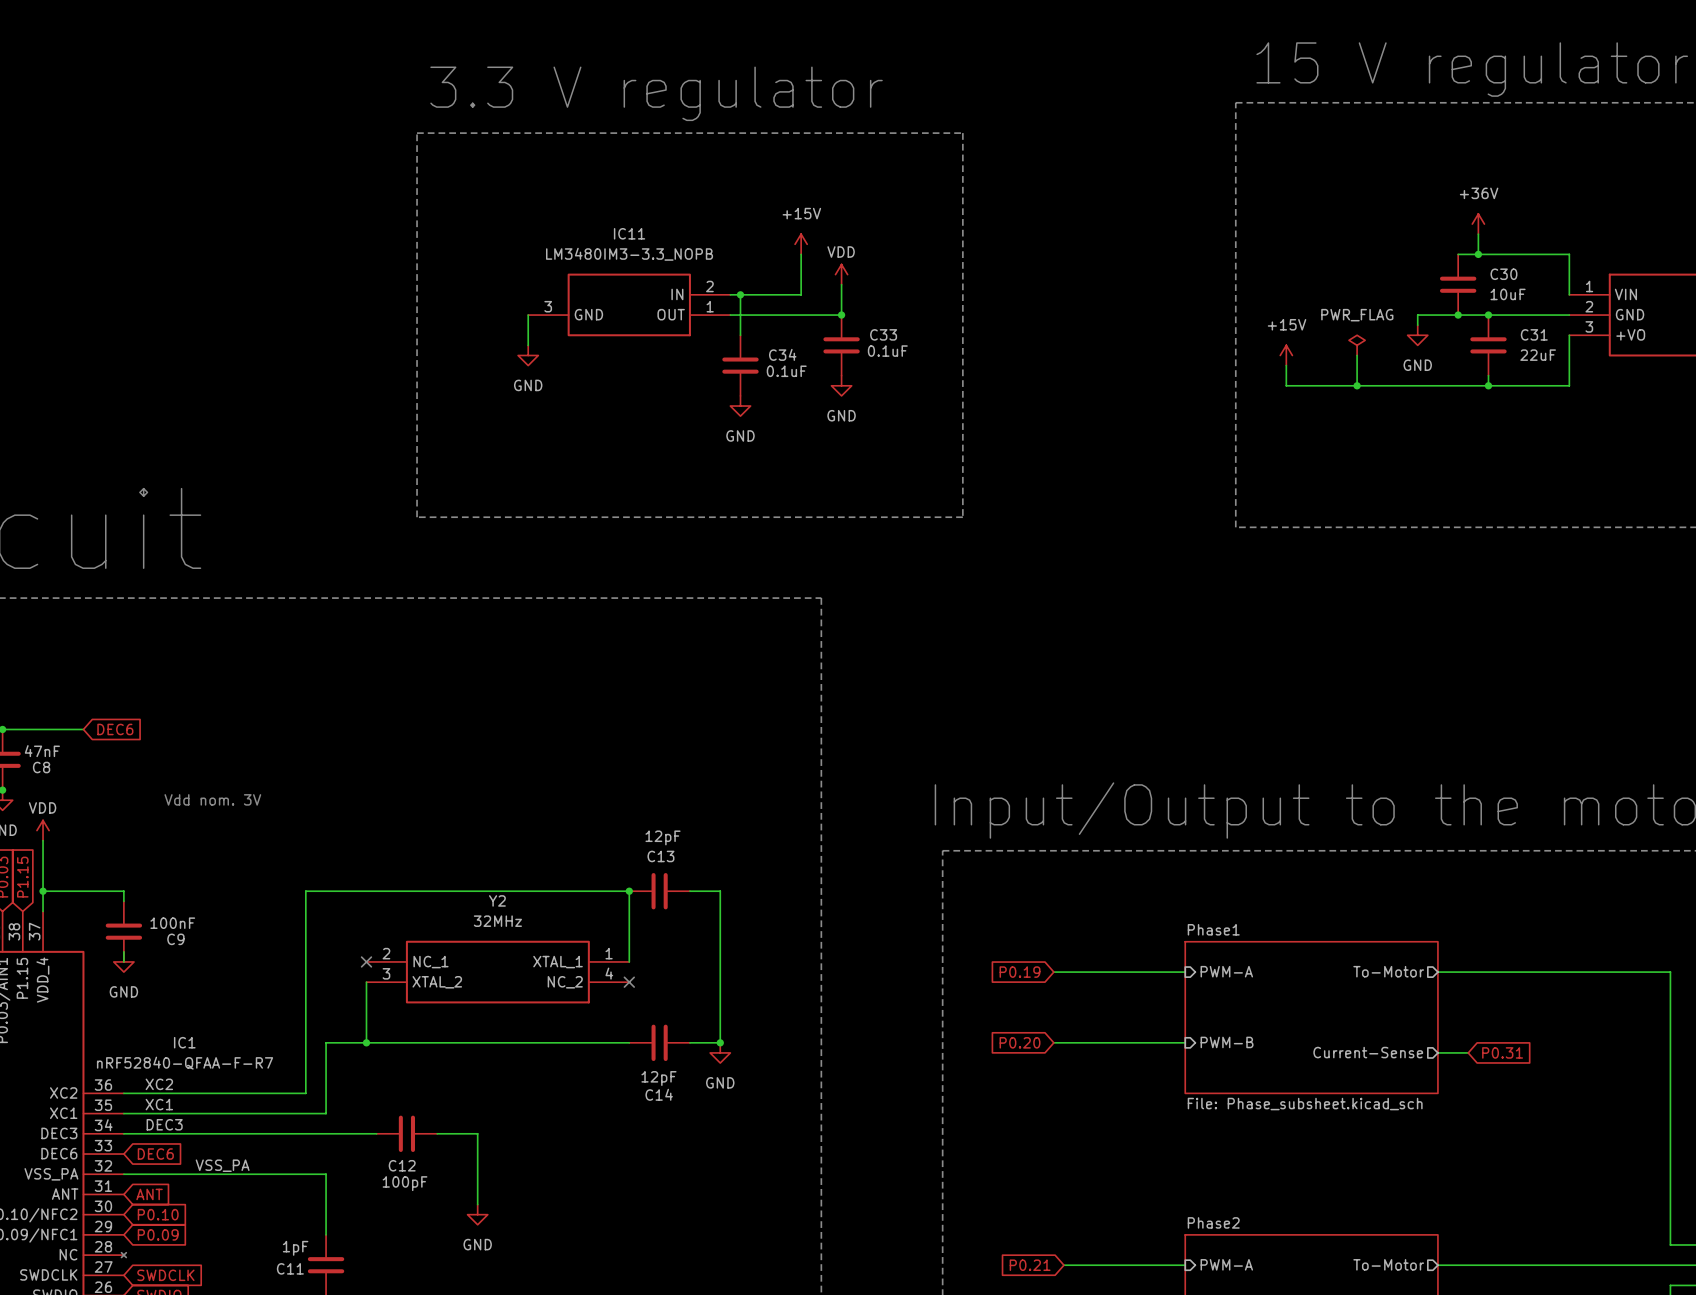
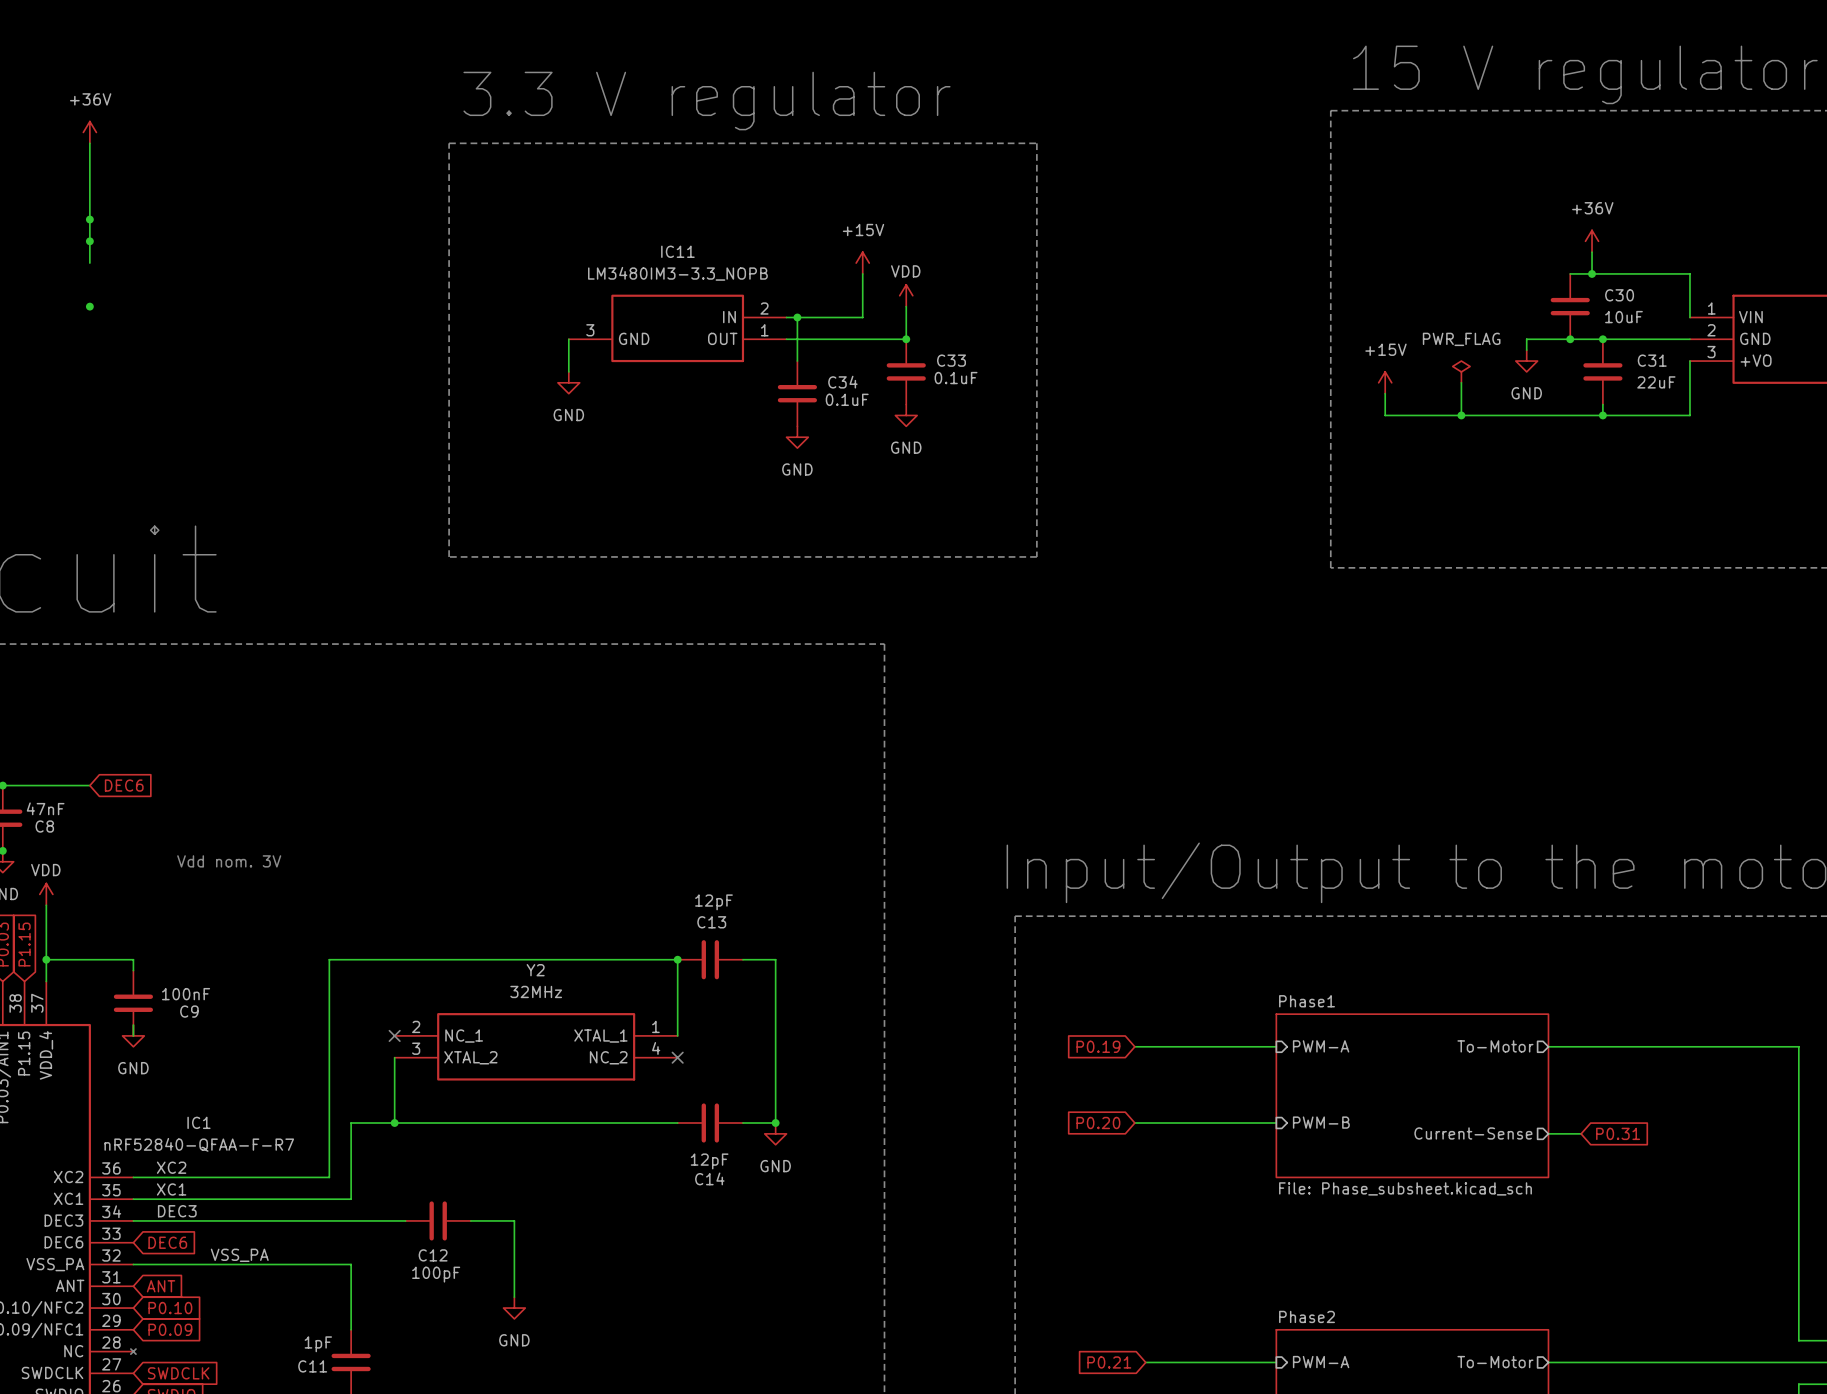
power symbol: none -> +36V (89, 132)
wire: none -> (89, 143) (89, 263)
junction: none -> (89, 219)
junction: none -> (89, 241)
junction: none -> (89, 306)

